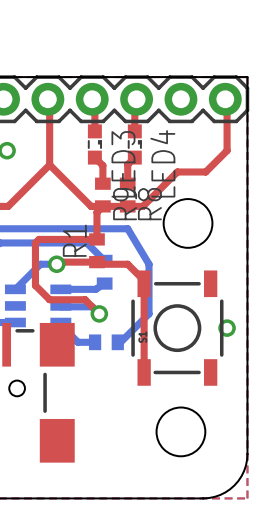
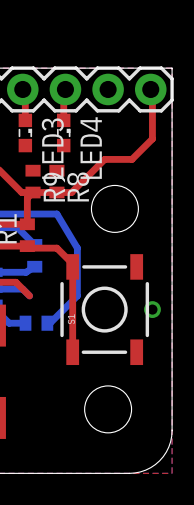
top track: (94, 157) (102, 165) (102, 183) -> none
top track: (134, 157) (127, 164) (127, 183) -> none
via: (99, 313) -> none

